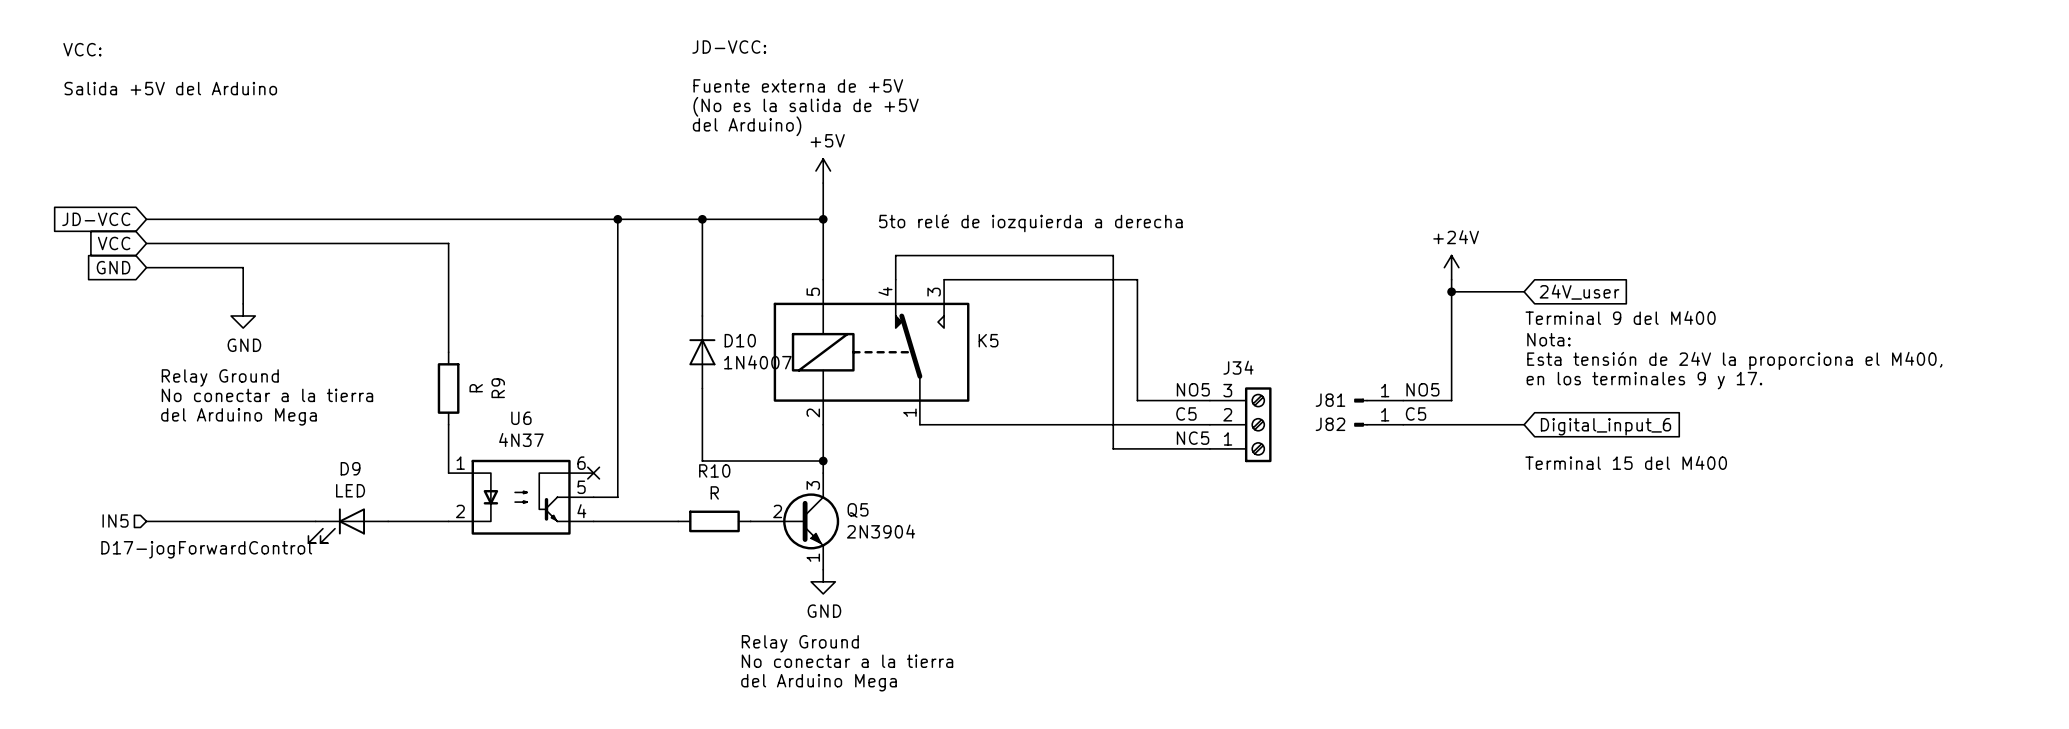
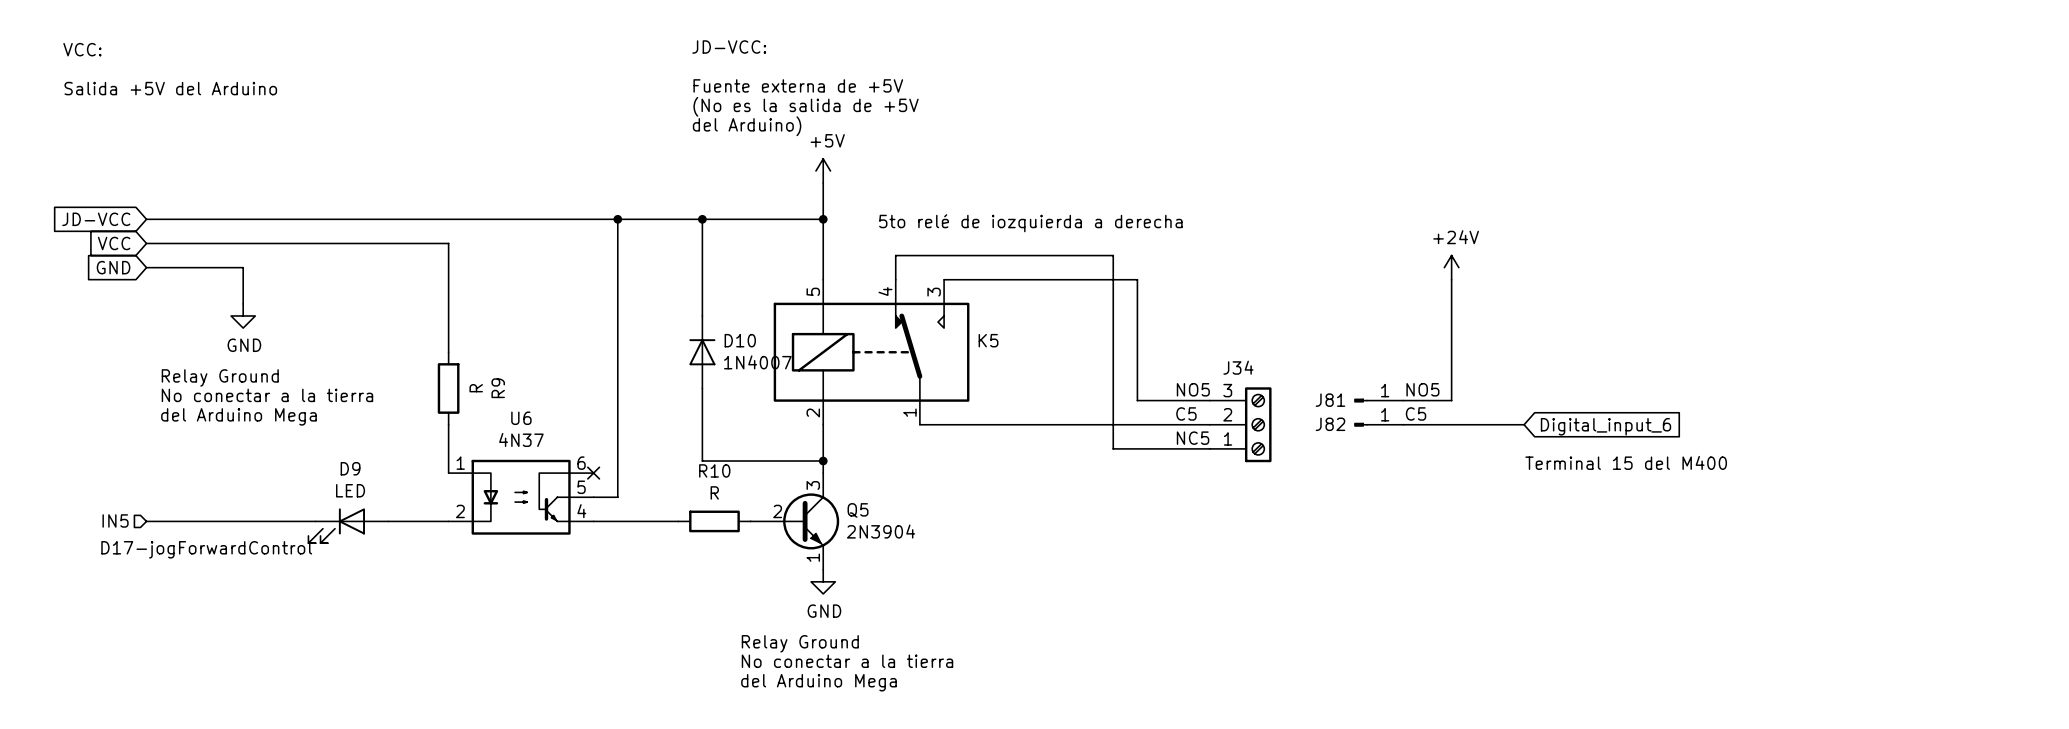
wire: (1451, 291) (1524, 291) -> none
junction: (1451, 291) -> none
global label: 24V_user (1579, 292) -> none
text: Terminal 9 del M400 (1620, 317) -> none
text: Nota: (1548, 339) -> none
text: Esta tensión de 24V la proporciona el M400, (1734, 360) -> none
text: en los terminales 9 y 17. (1644, 380) -> none

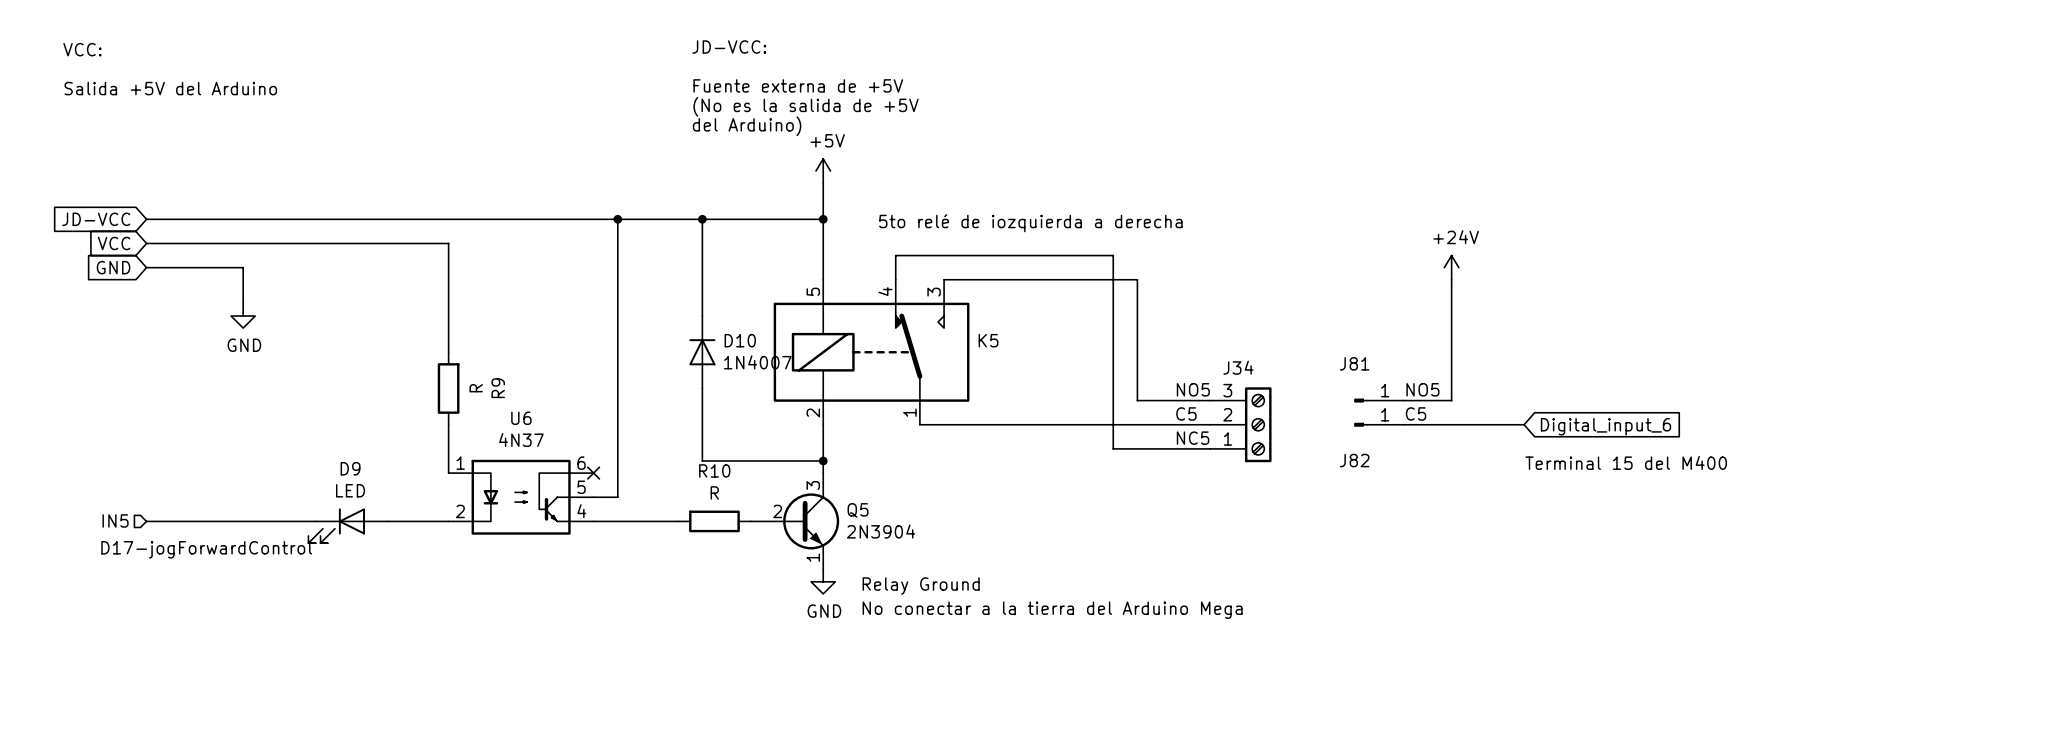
text: Relay Ground (220, 377) -> none
text: No conectar a la tierra (267, 395) -> none
J81 name position: J81 (1330, 400) -> J81 (1354, 363)
text: del Arduino Mega (238, 416) -> none
J82 name position: J82 (1330, 424) -> J82 (1354, 460)
text: none -> No conectar a la tierra del Arduino Mega (1052, 610)
text position: Relay Ground (800, 643) -> Relay Ground (921, 586)
text: No conectar a la tierra (847, 661) -> none
text: del Arduino Mega (819, 682) -> none

